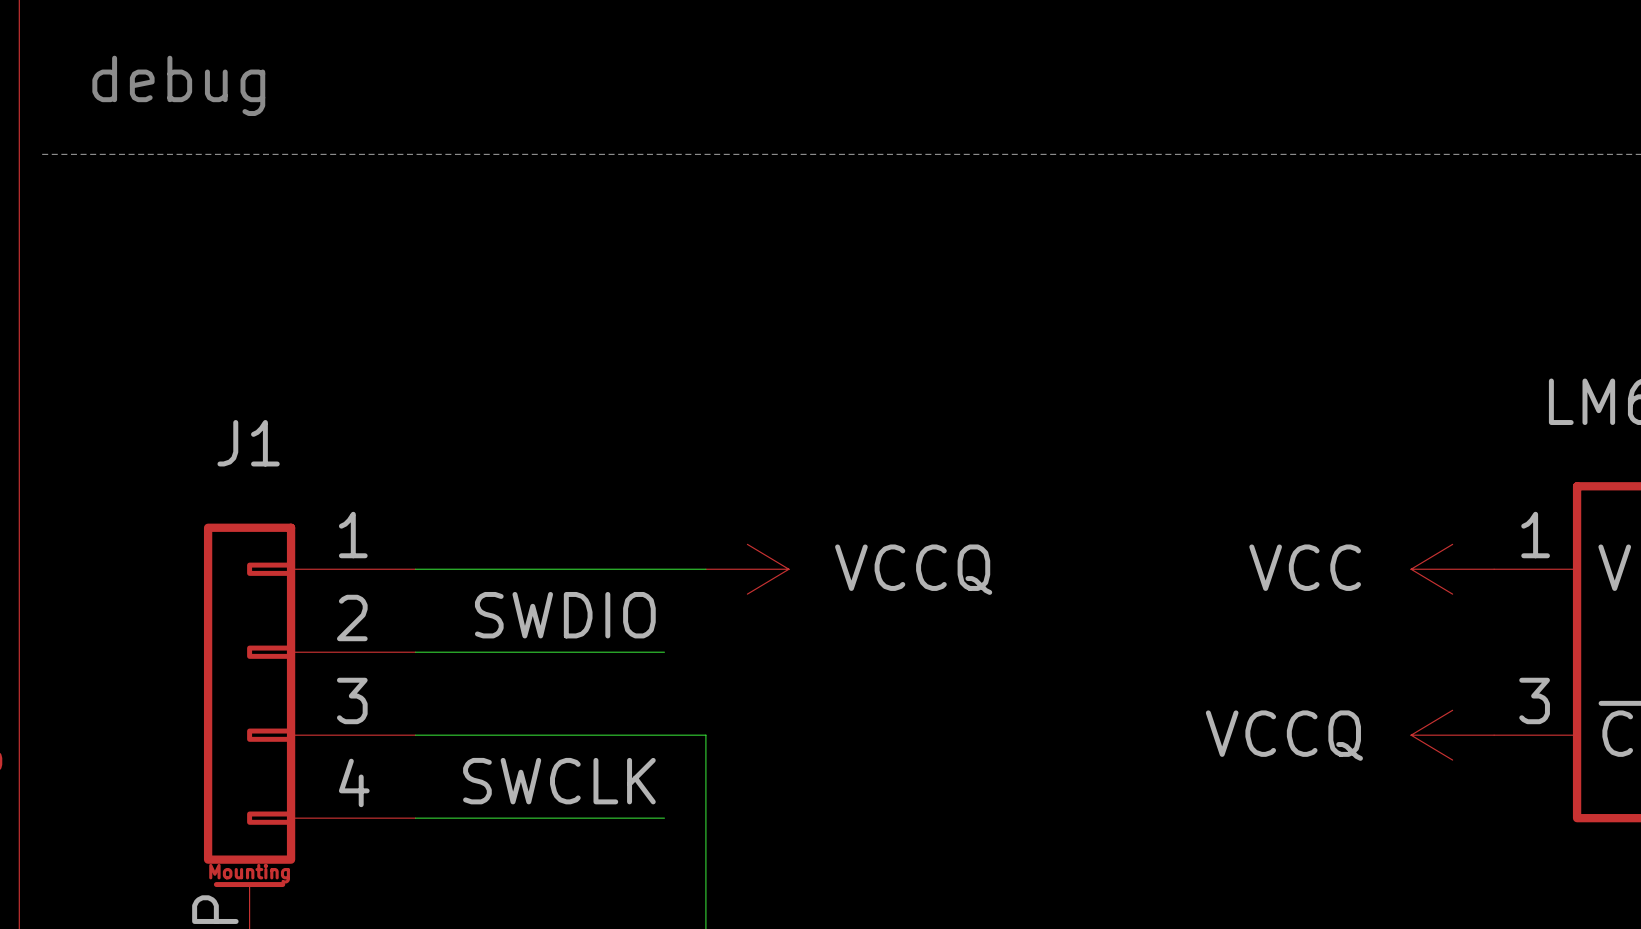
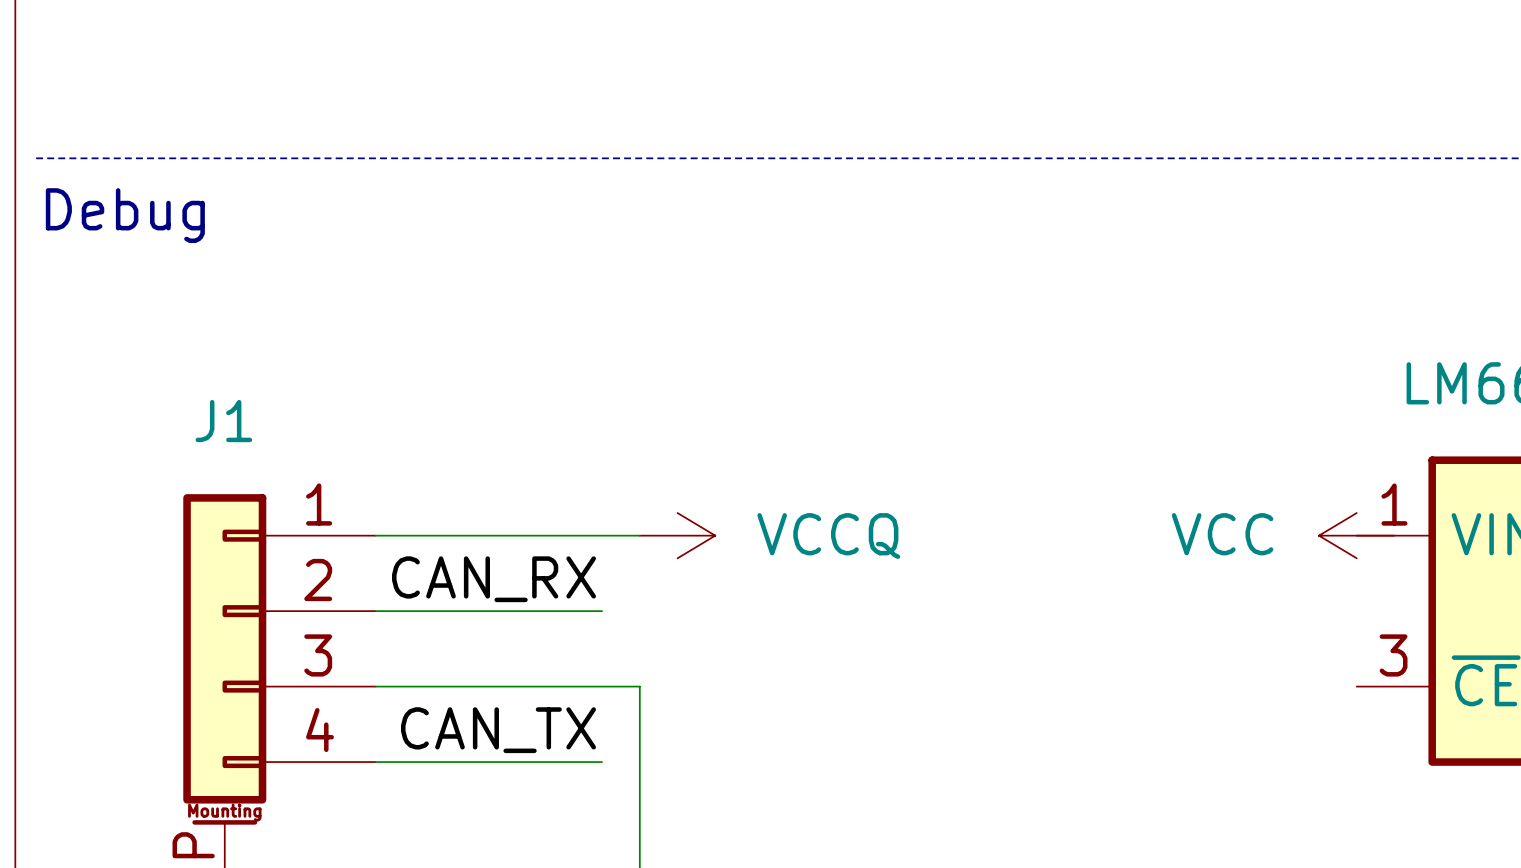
text: debug (178, 85) -> none
text: none -> Debug (125, 215)
power symbol position: VCC (1452, 569) -> VCC (1356, 535)
label: SWDIO (565, 615) -> CAN_RX (494, 579)
power symbol: VCCQ (1452, 735) -> none
label: SWCLK (559, 781) -> CAN_TX (498, 730)

